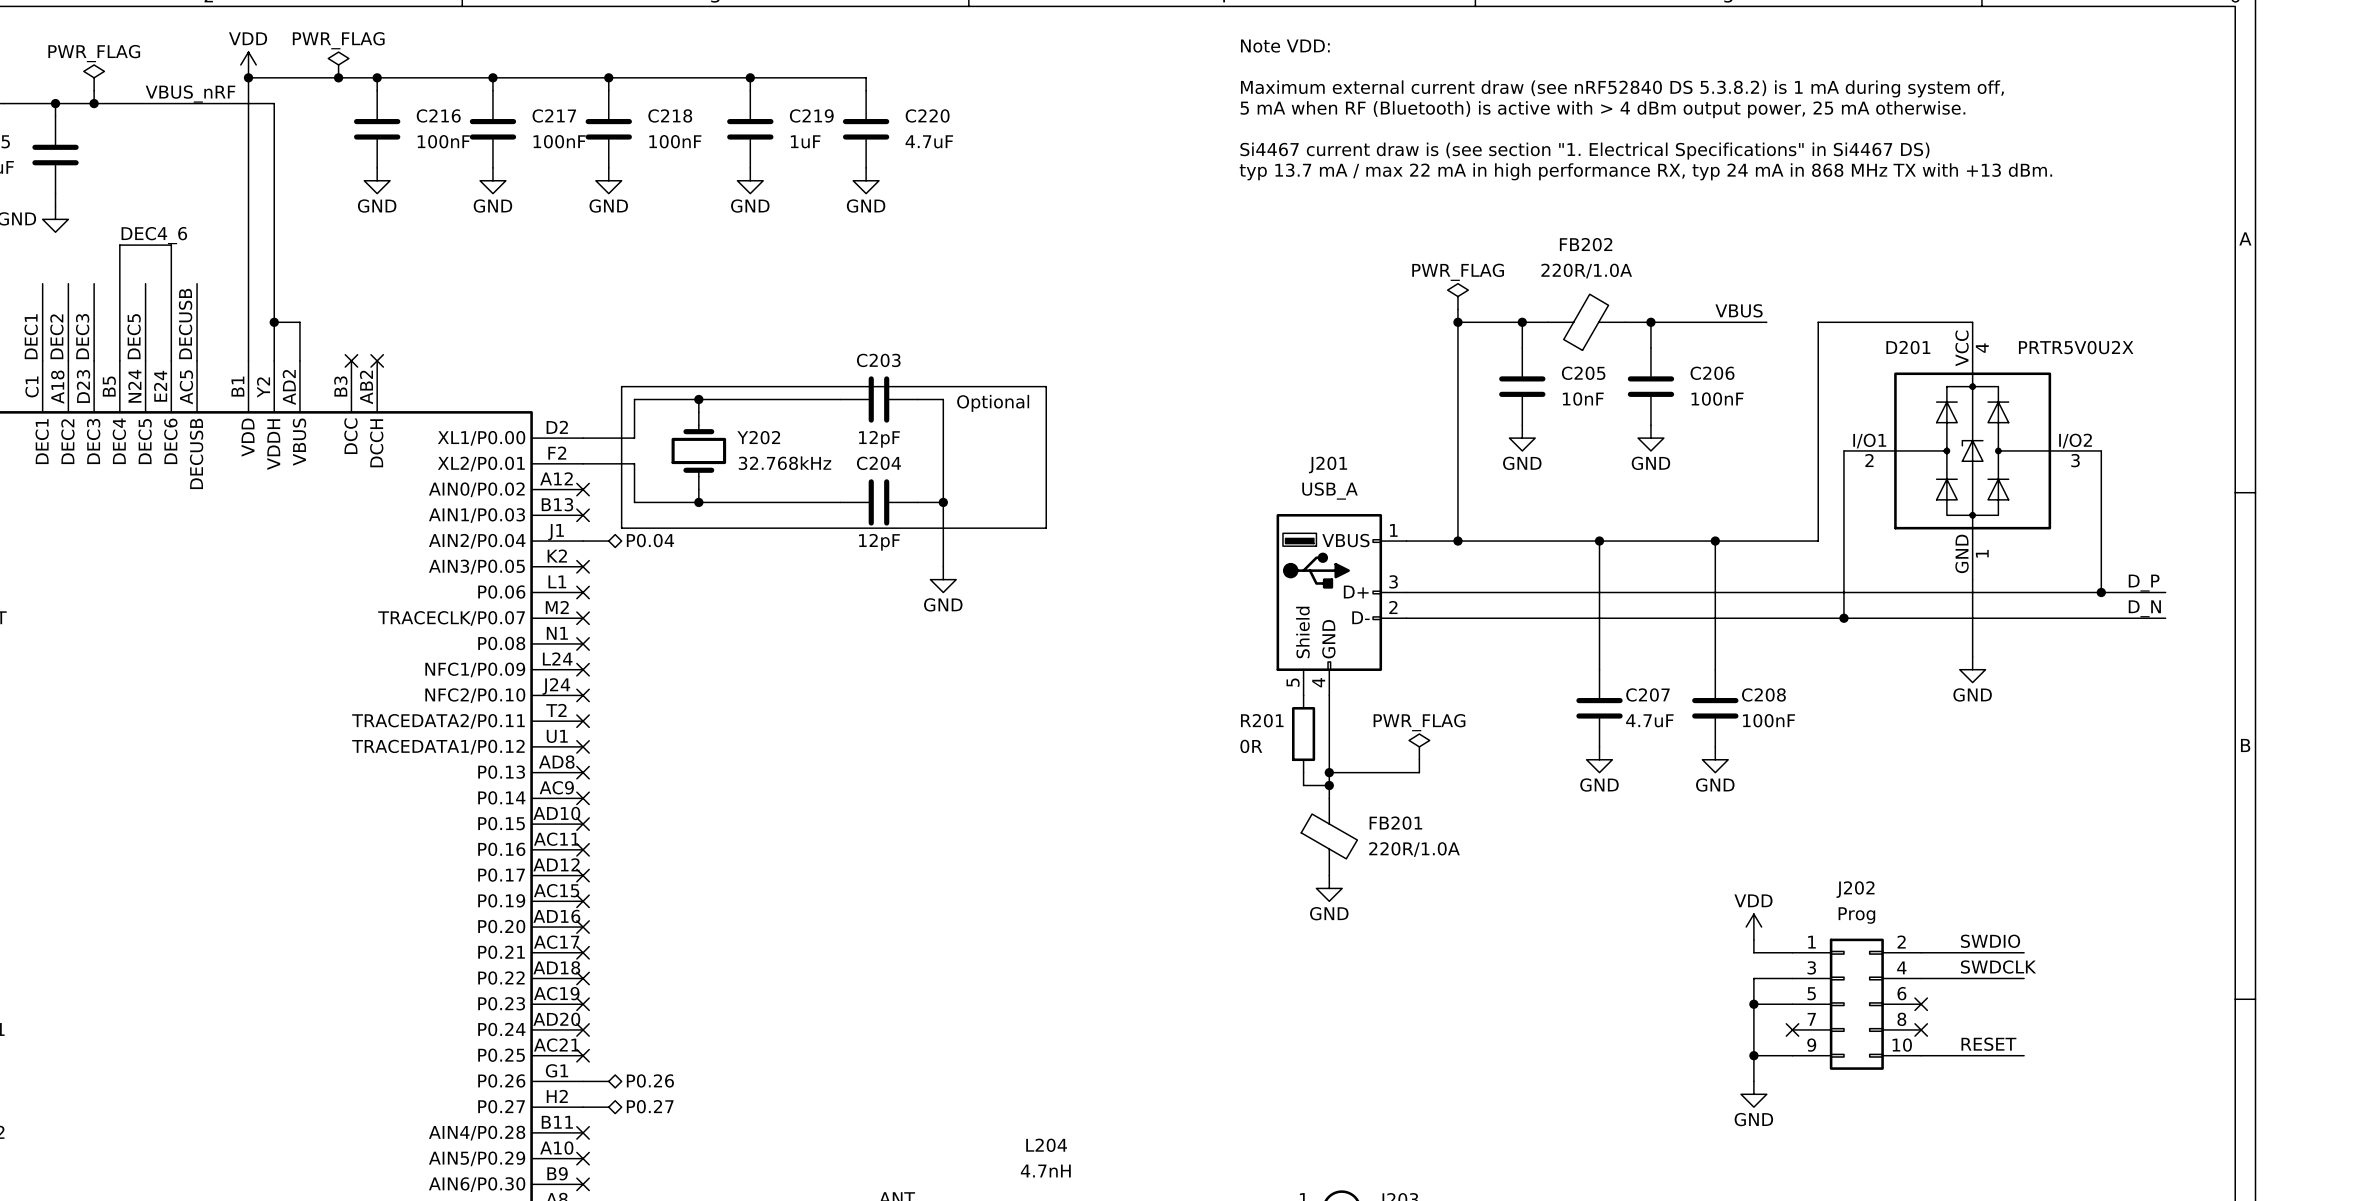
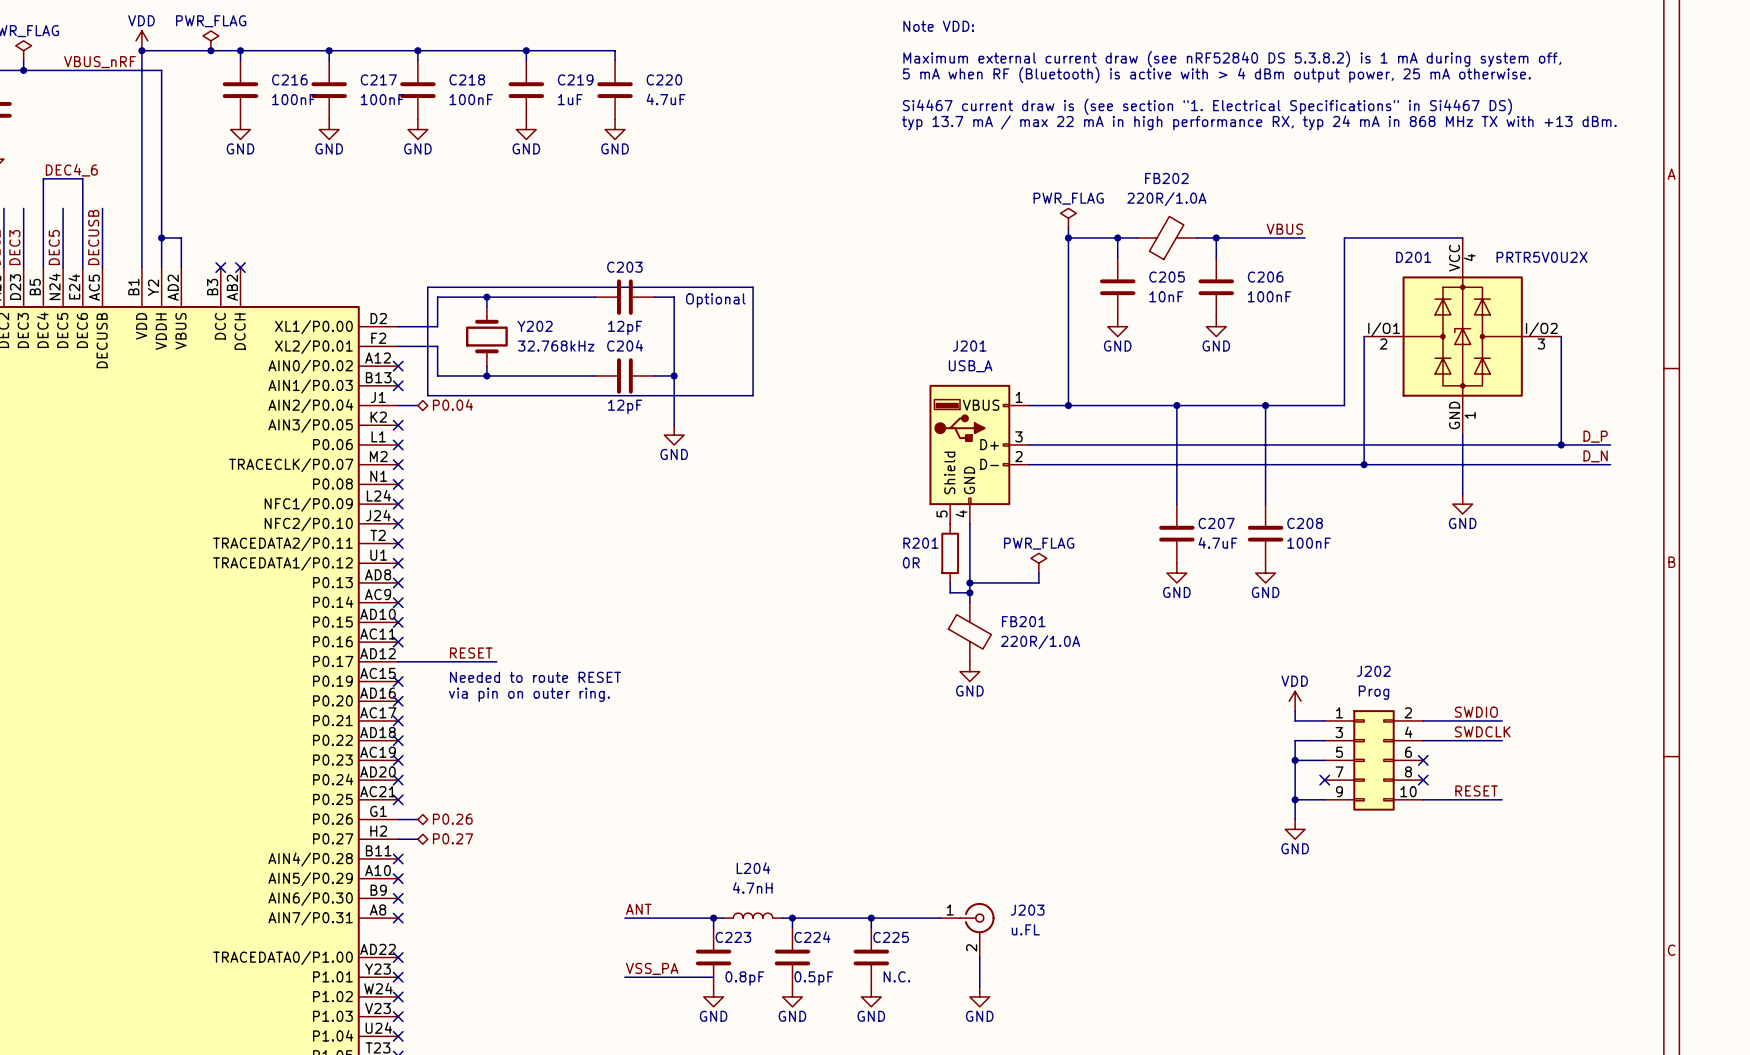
label: none -> RESET (471, 653)
wire: none -> (398, 661) (496, 661)
no-connect mark: (583, 875) -> none
text: none -> Needed to route RESET (535, 677)
text: none -> via pin on outer ring. (529, 694)

